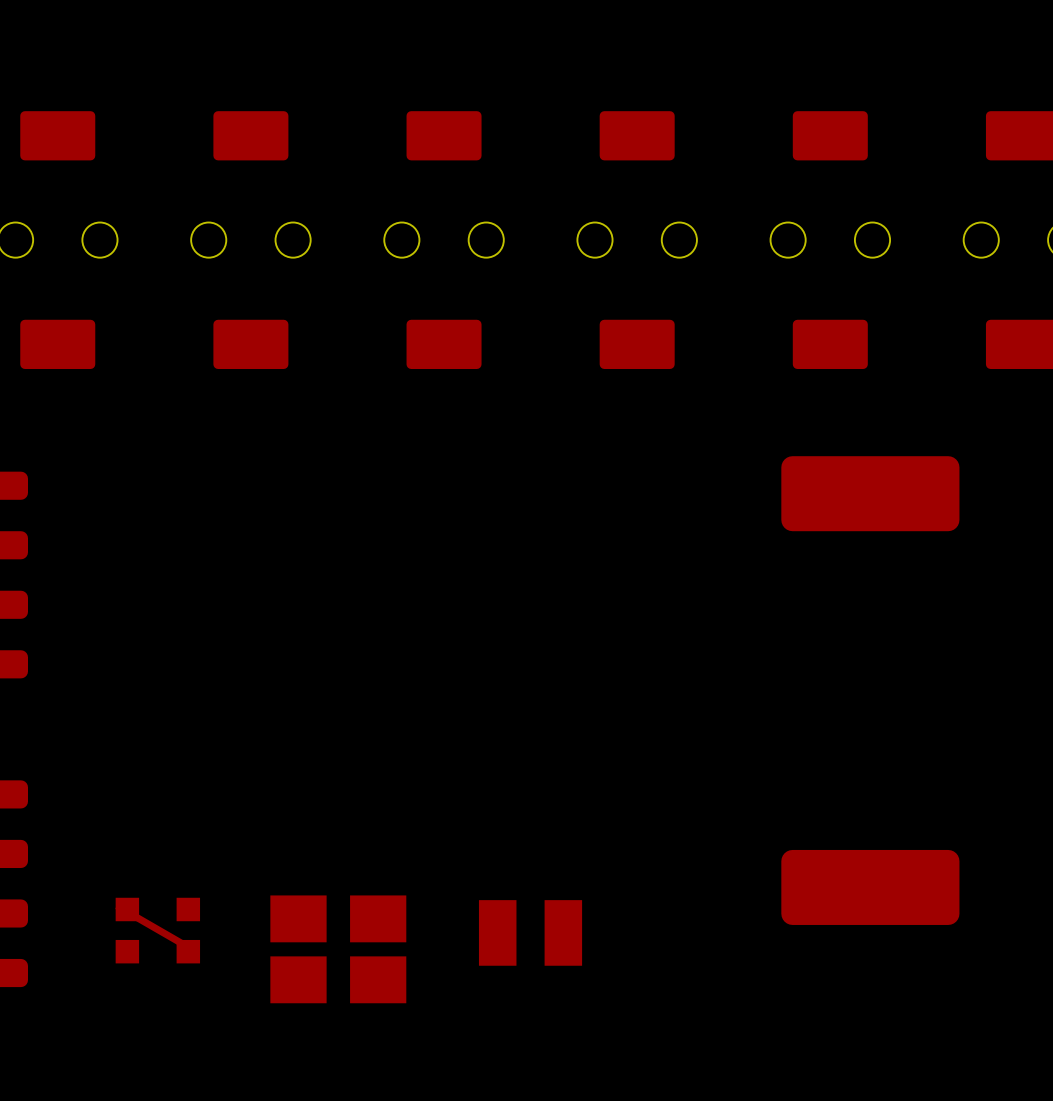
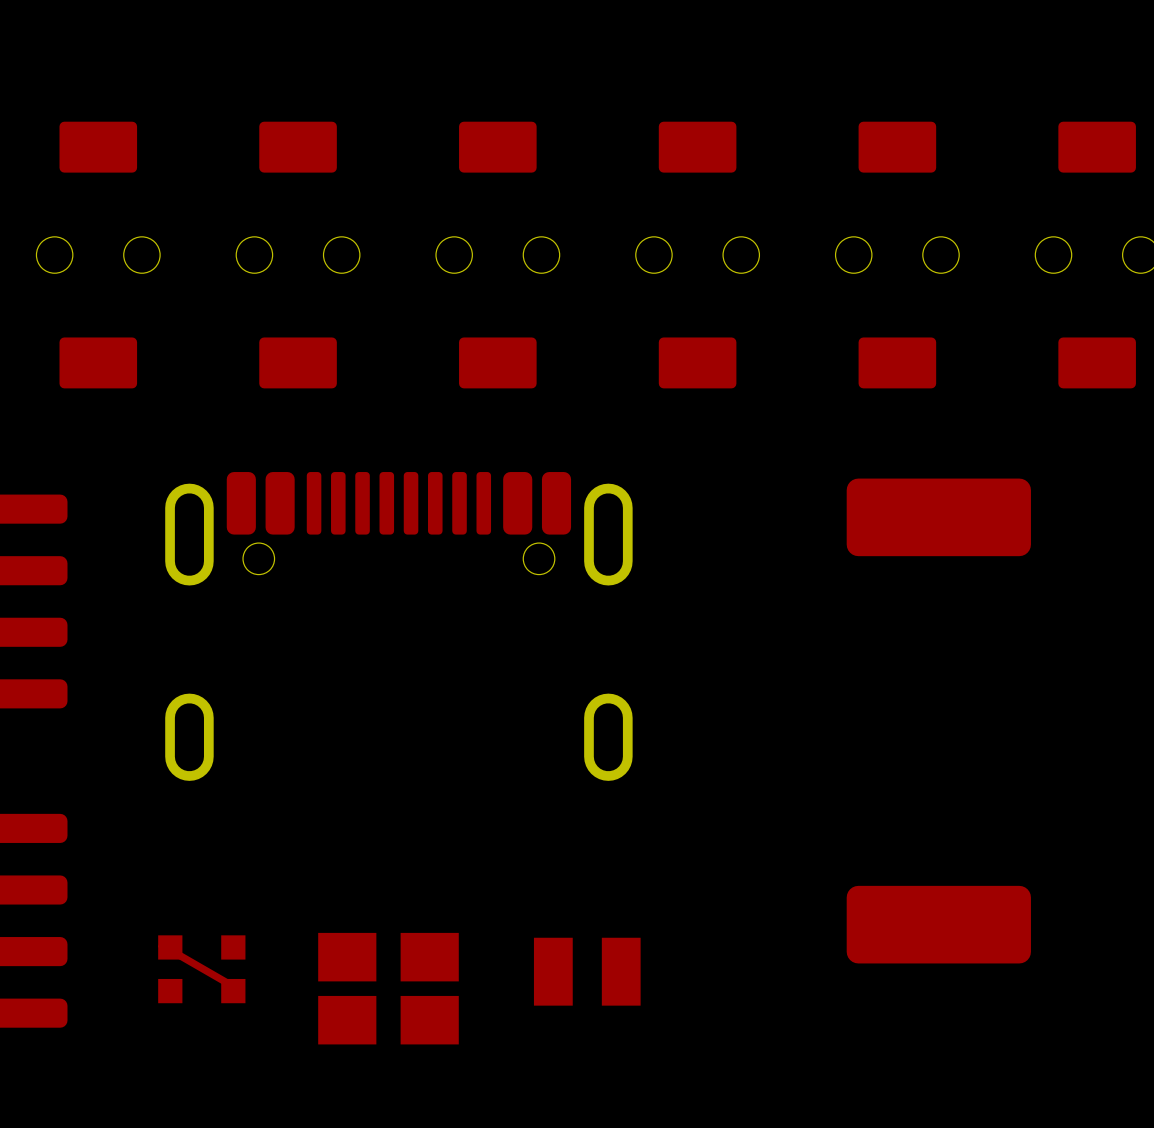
part: none -> (398, 626)

